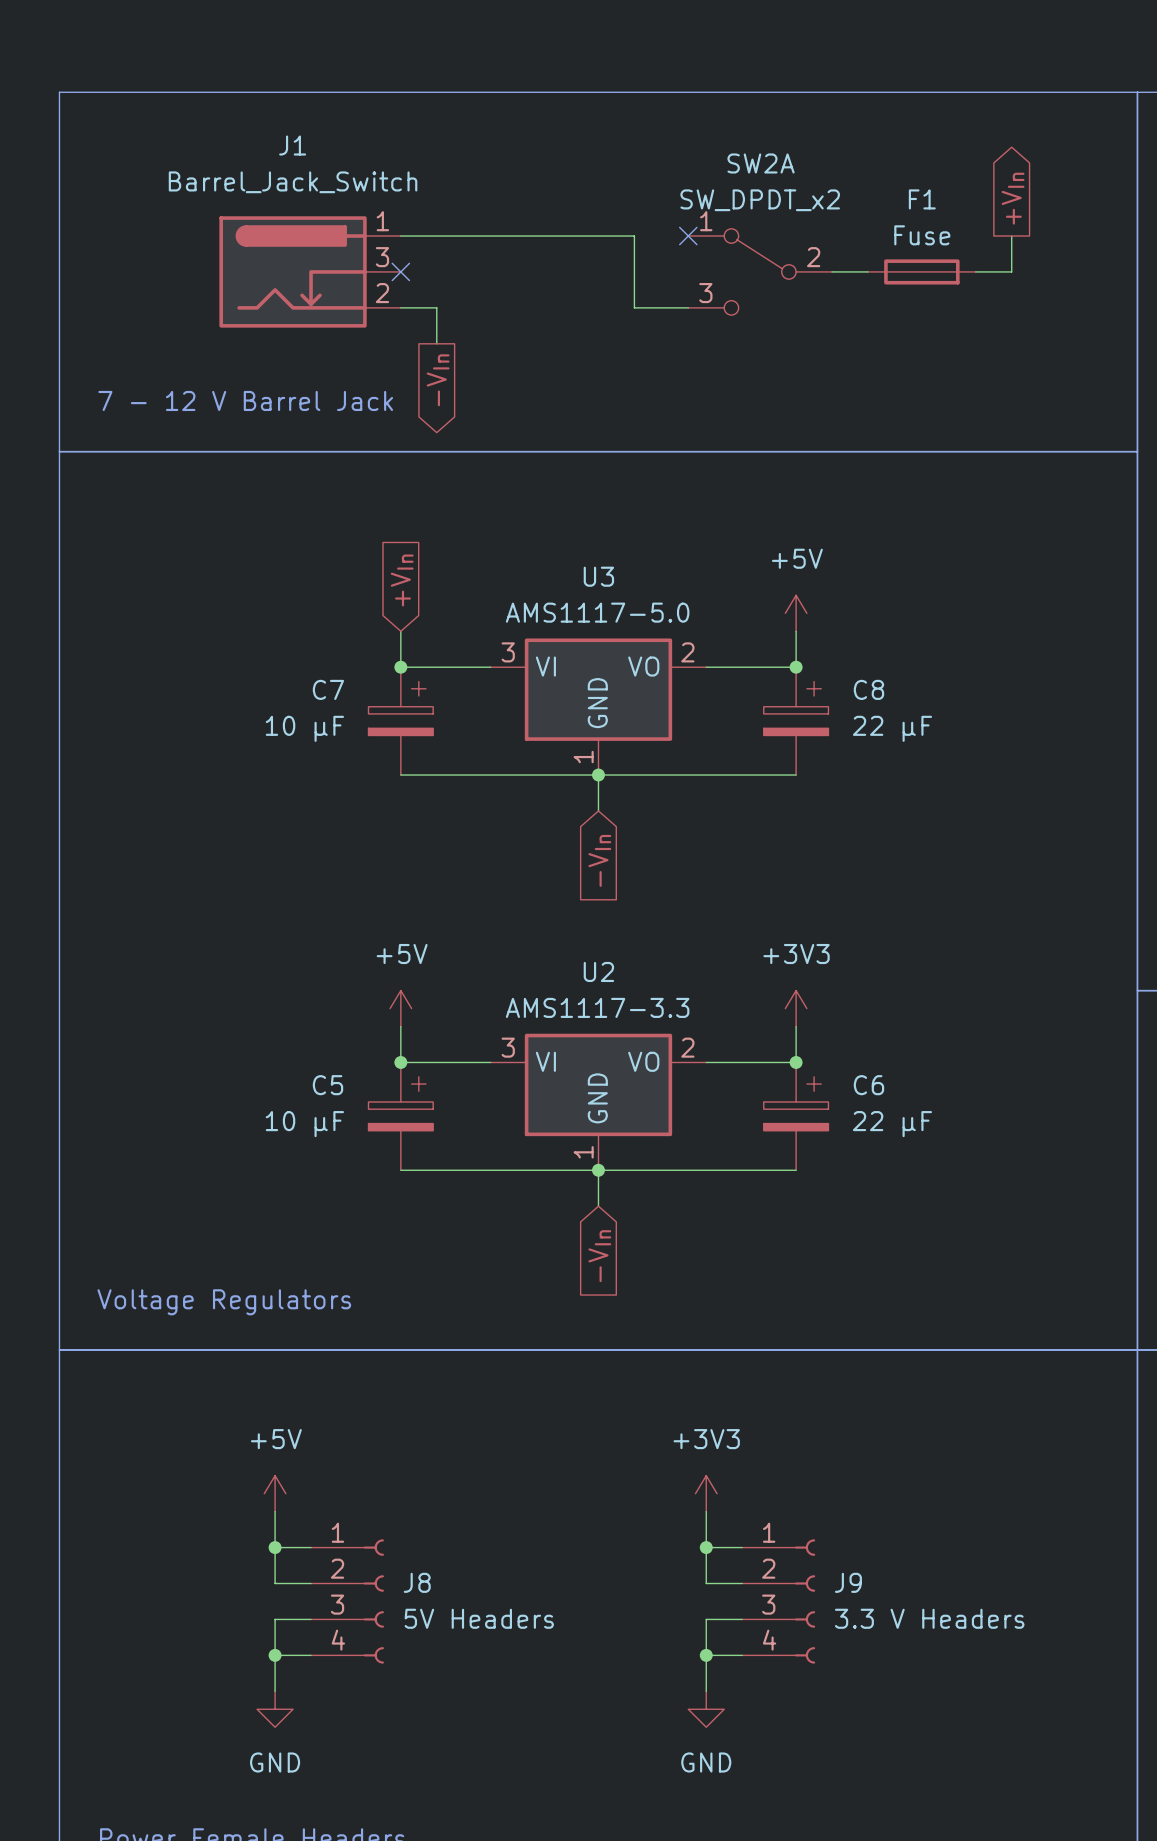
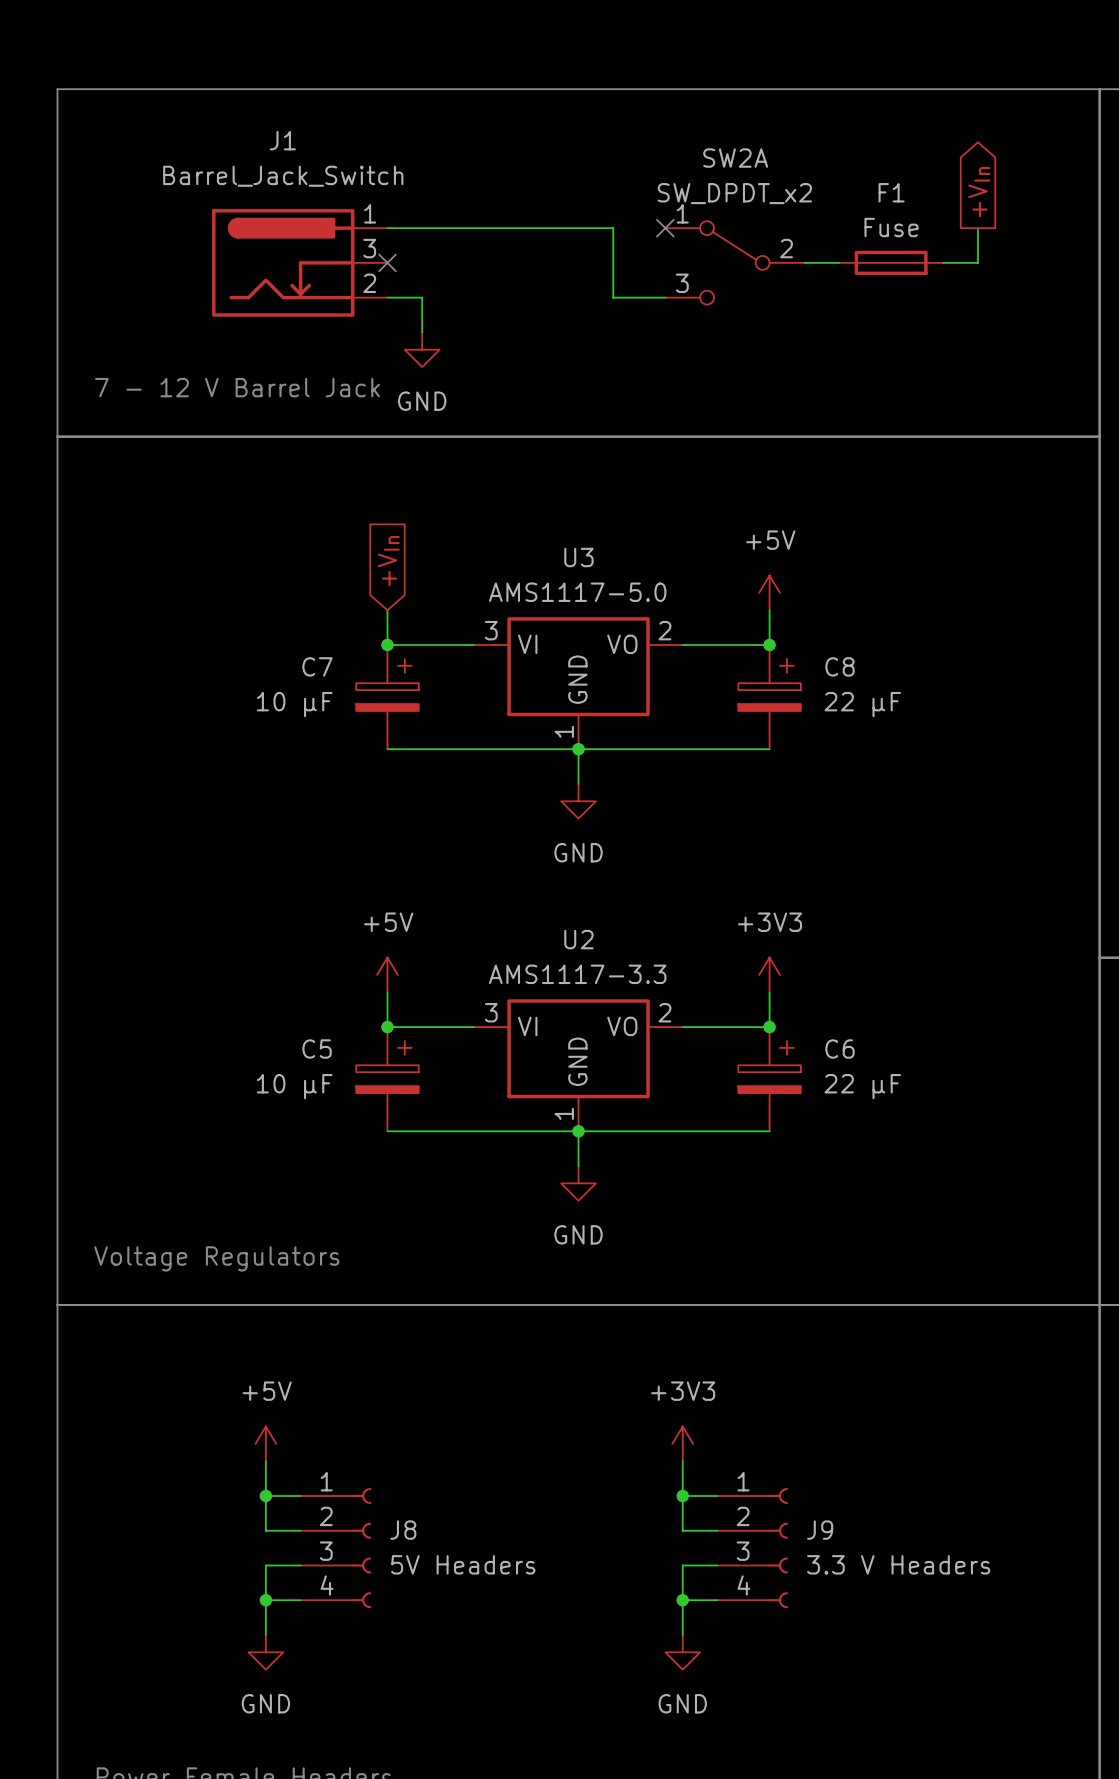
power symbol: none -> GND (422, 349)
global label: -VIn (438, 380) -> none
power symbol: none -> GND (578, 801)
global label: -VIn (599, 860) -> none
power symbol: none -> GND (578, 1183)
global label: -VIn (599, 1256) -> none

